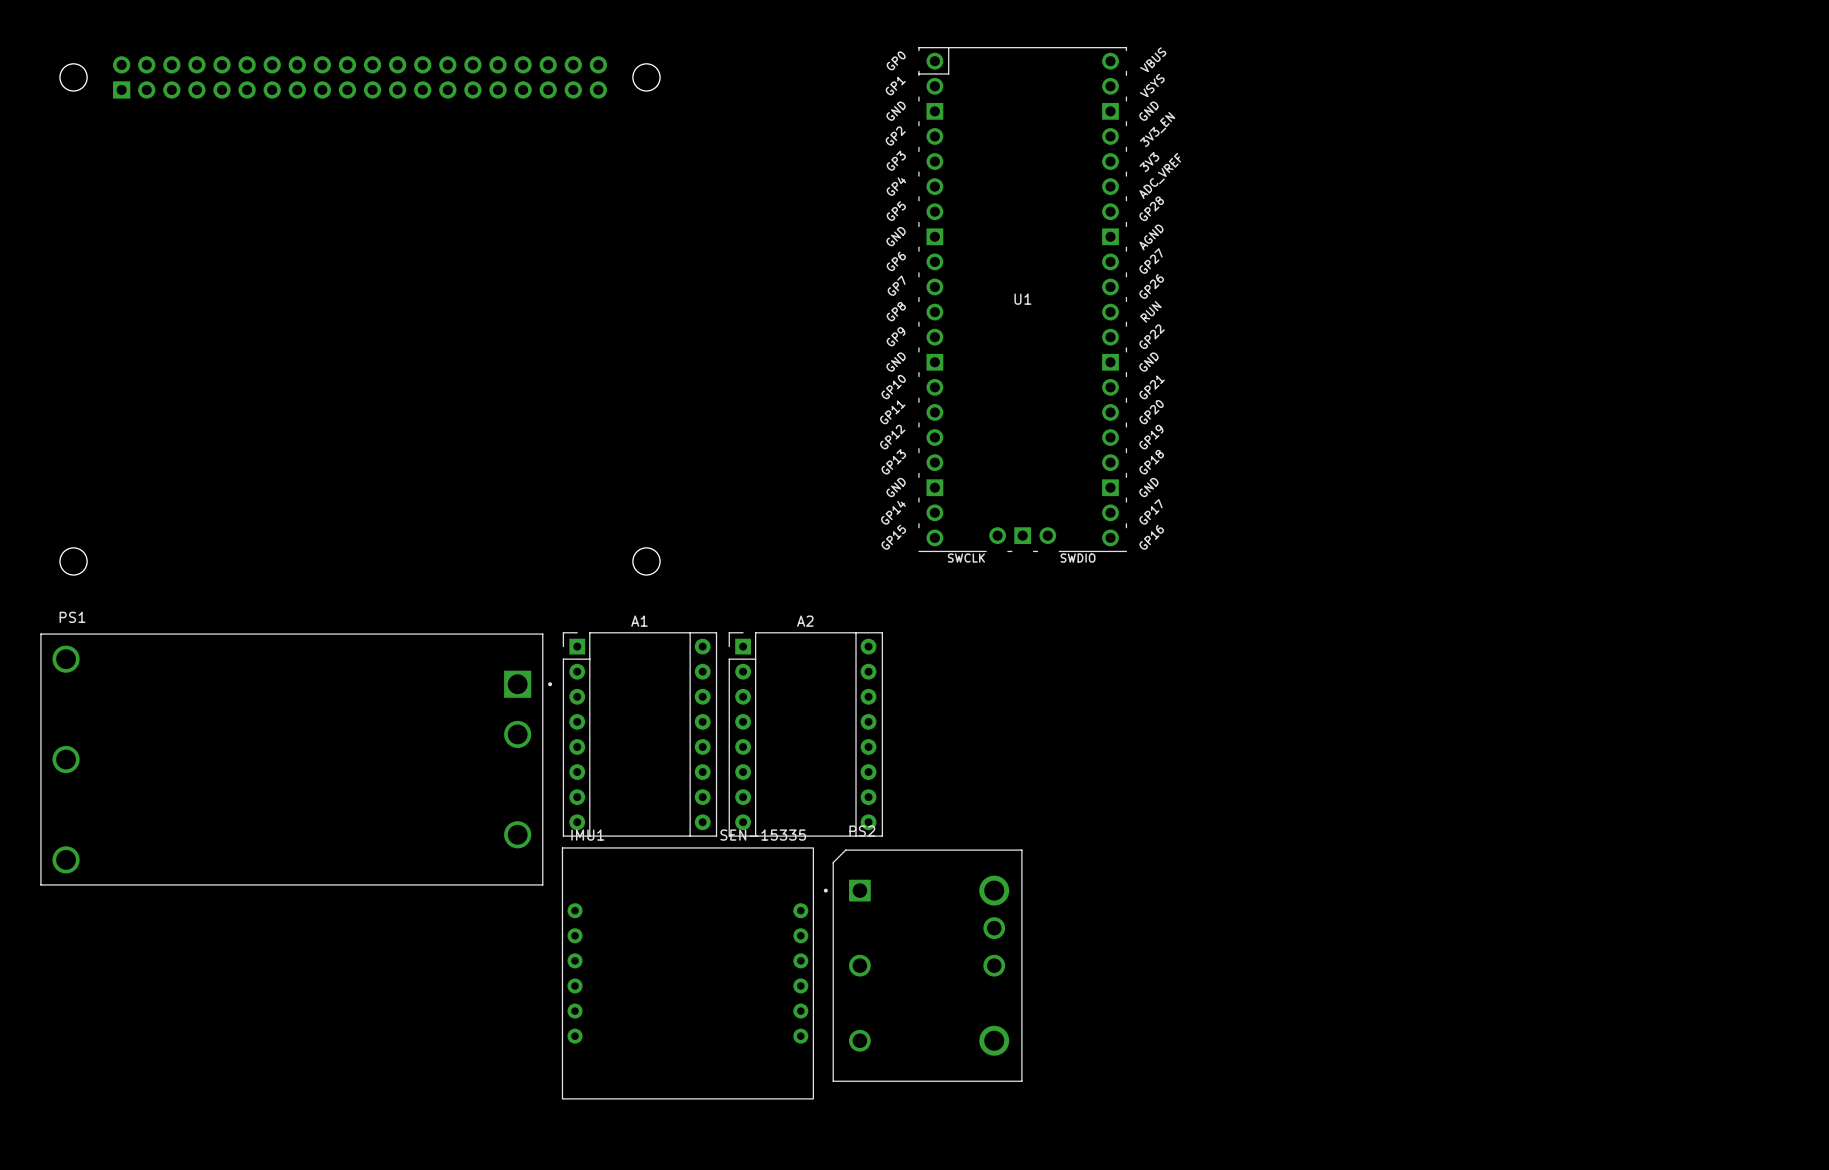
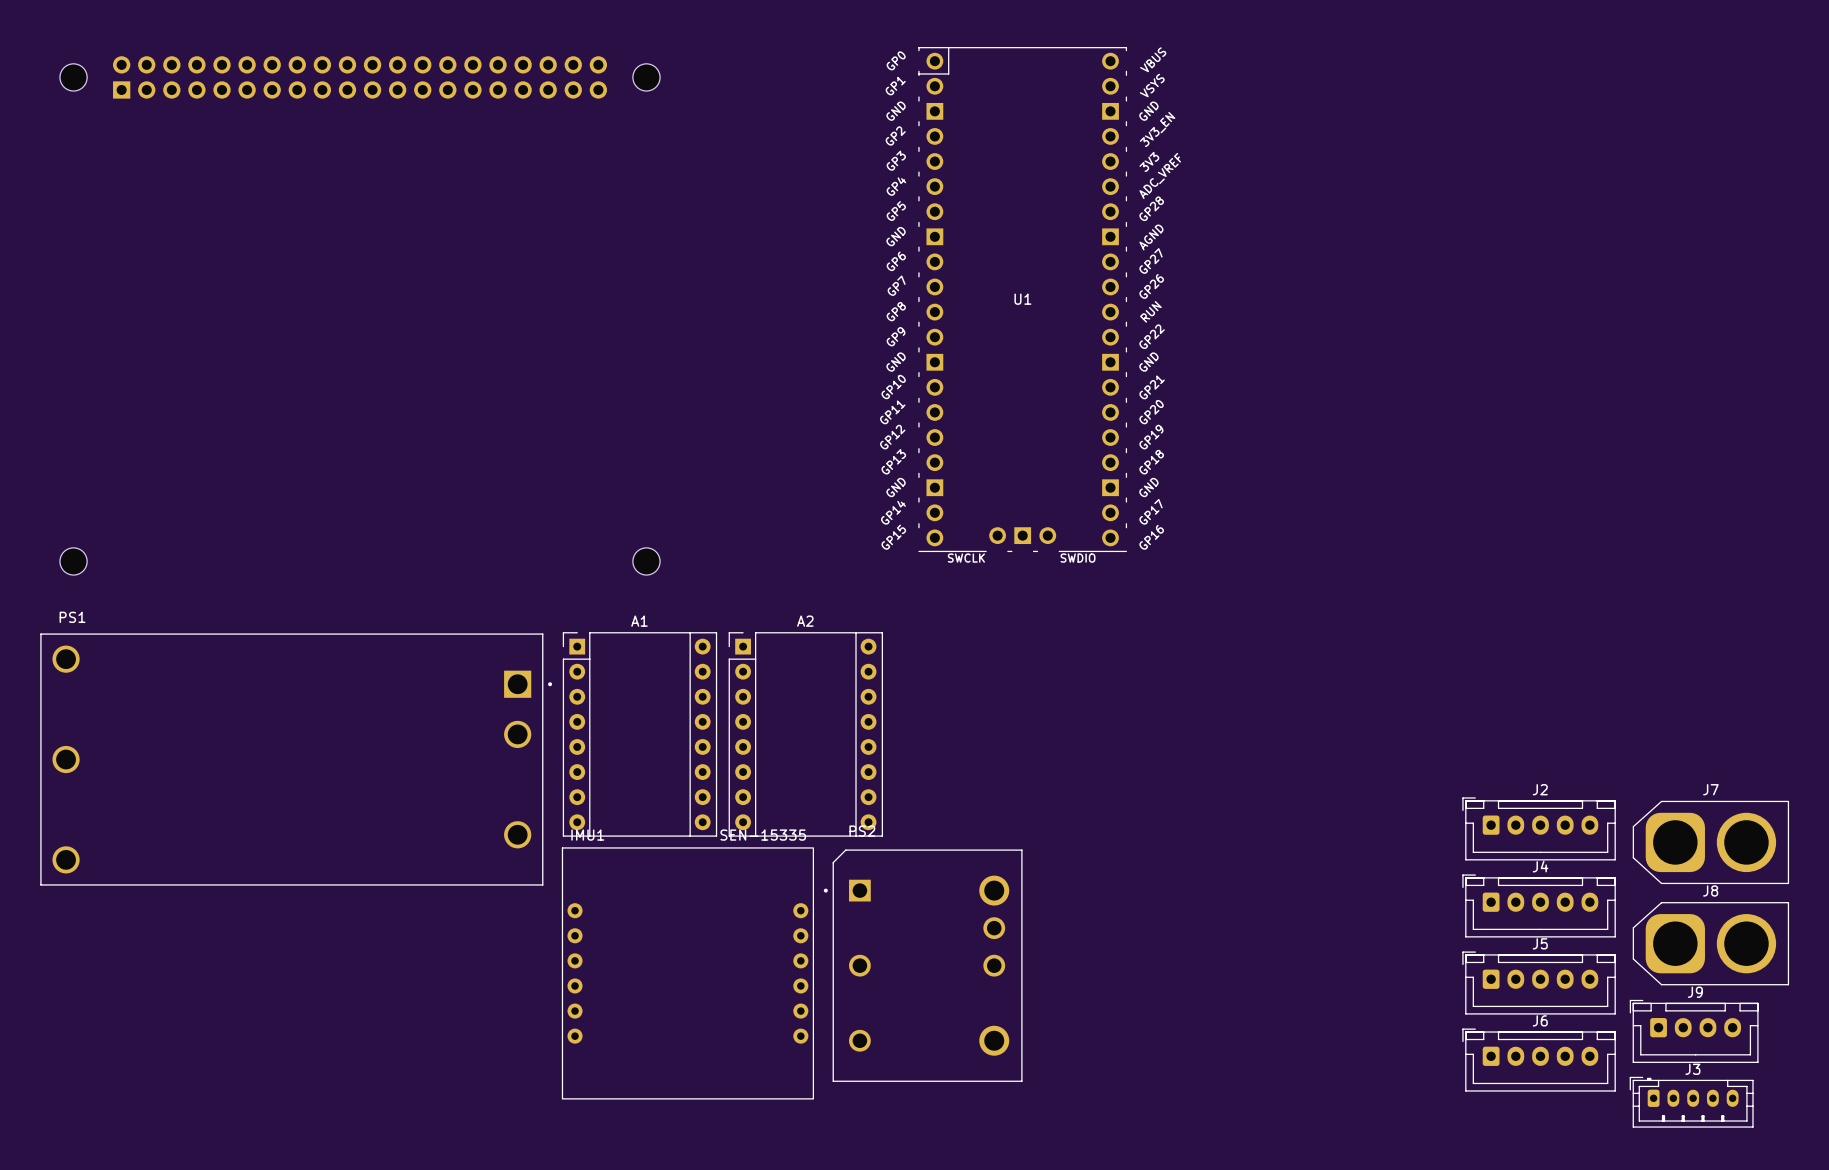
J2: none -> (1539, 828)
J7: none -> (1710, 842)
J4: none -> (1539, 905)
J8: none -> (1710, 943)
J5: none -> (1539, 983)
J9: none -> (1694, 1031)
J6: none -> (1539, 1060)
J3: none -> (1691, 1102)

